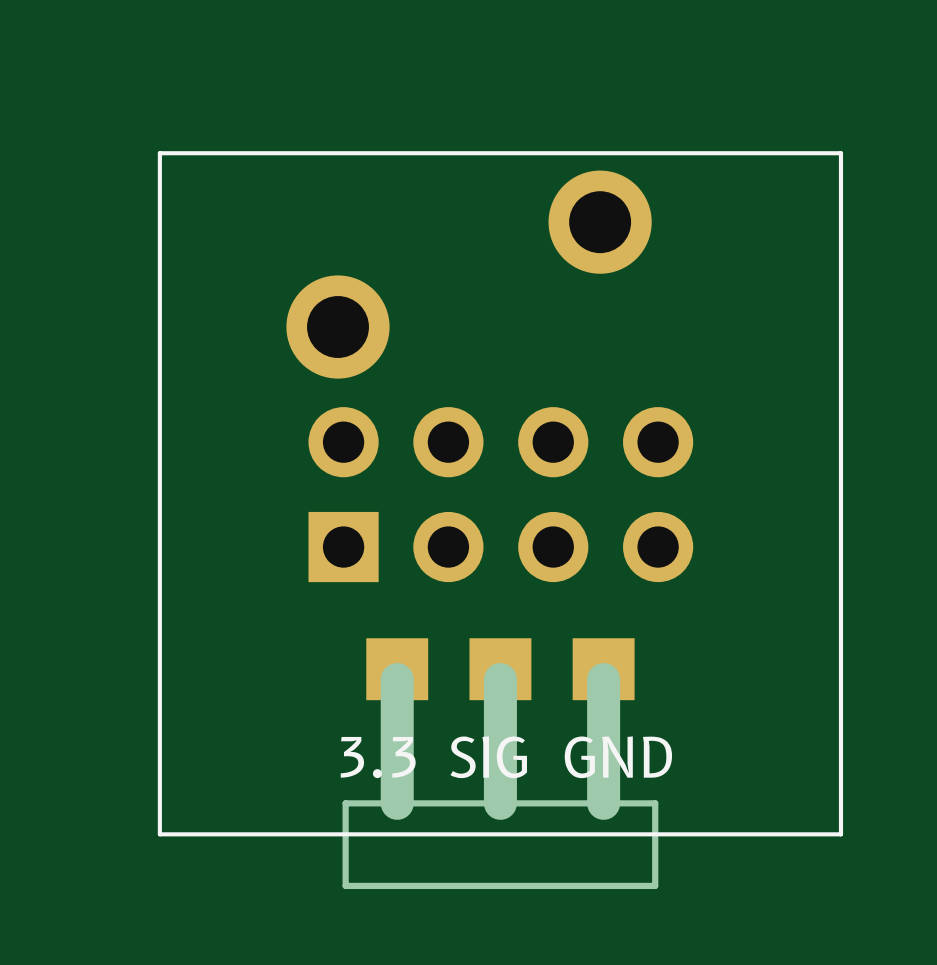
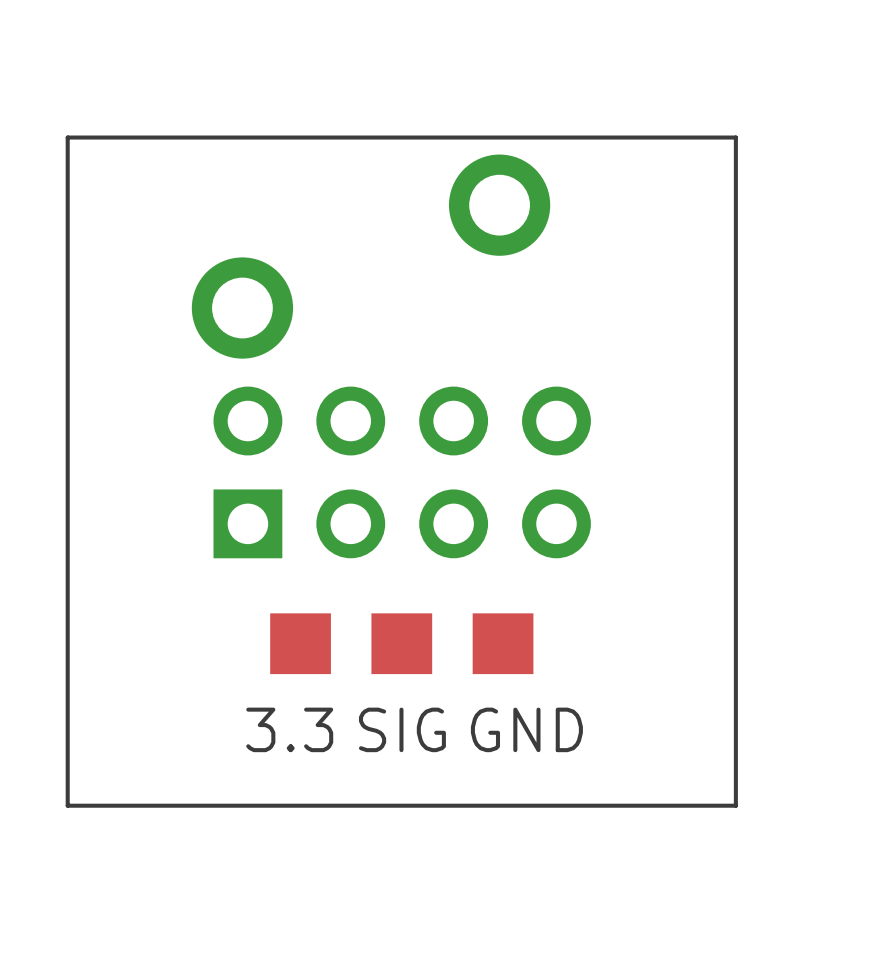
line: (397, 679) (397, 803) -> none
line: (500, 679) (500, 803) -> none
line: (603, 679) (603, 803) -> none
line: (345, 803) (655, 803) (655, 885) (345, 885) (345, 803) -> none

